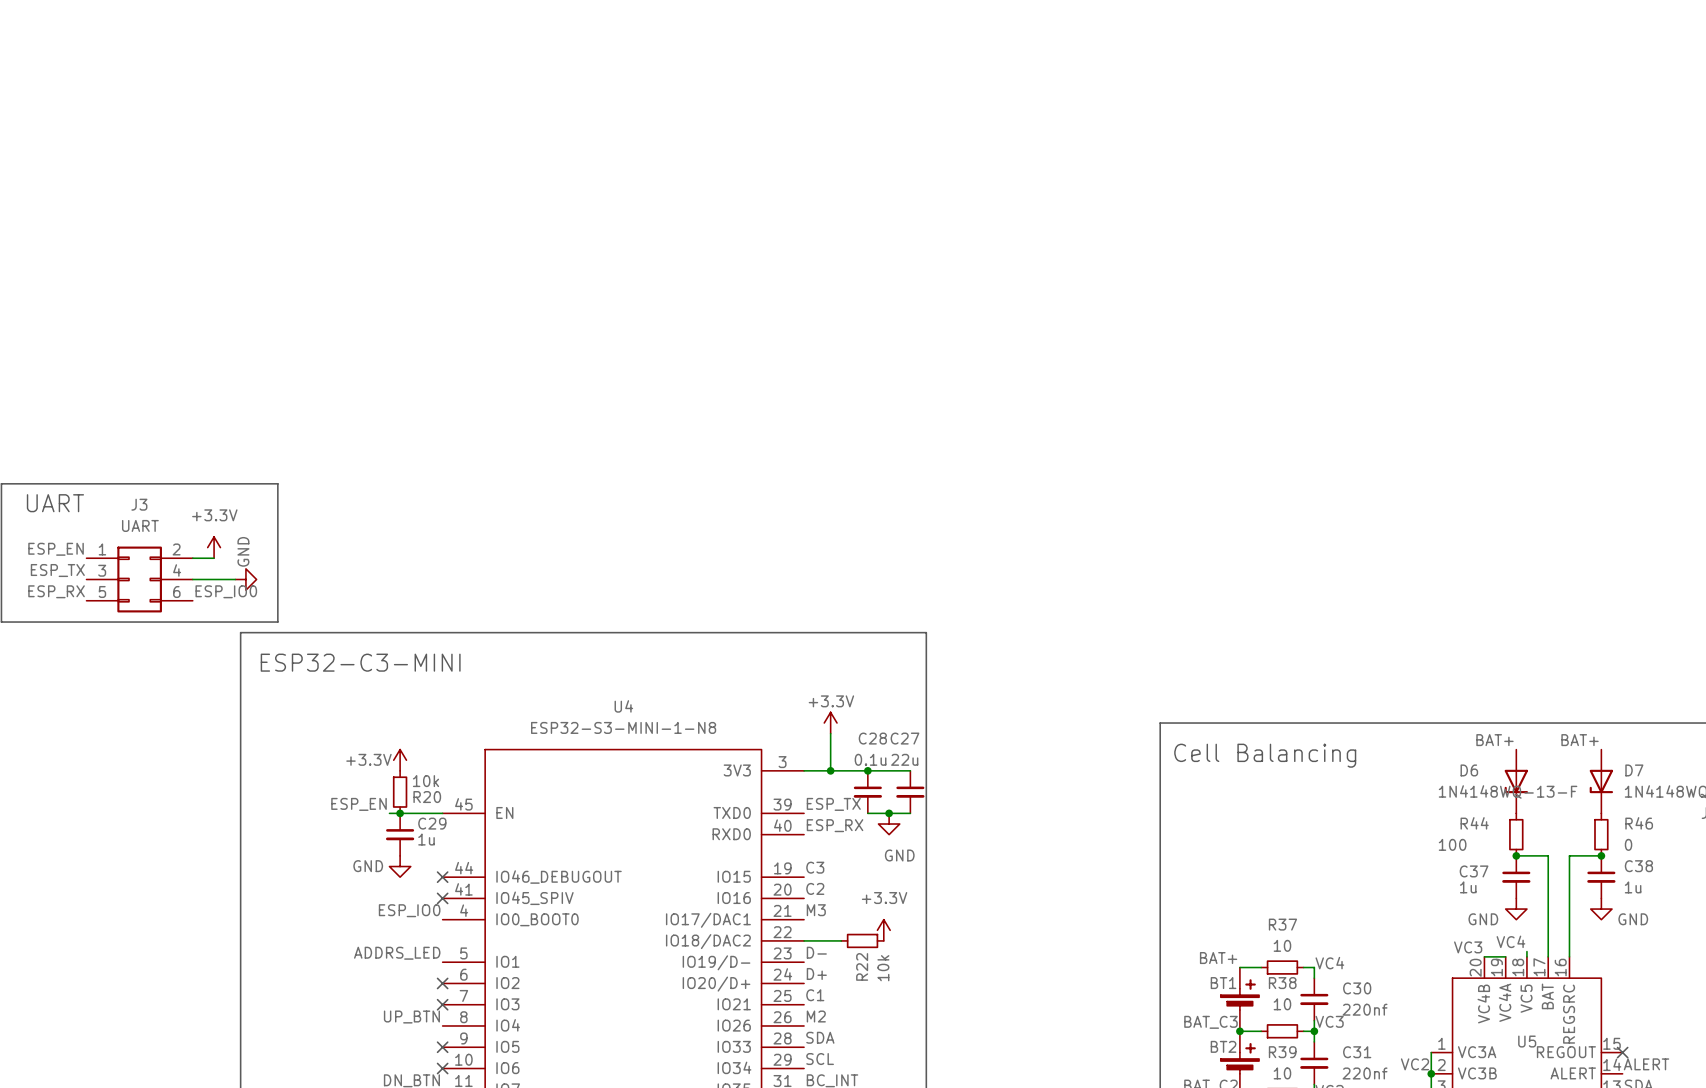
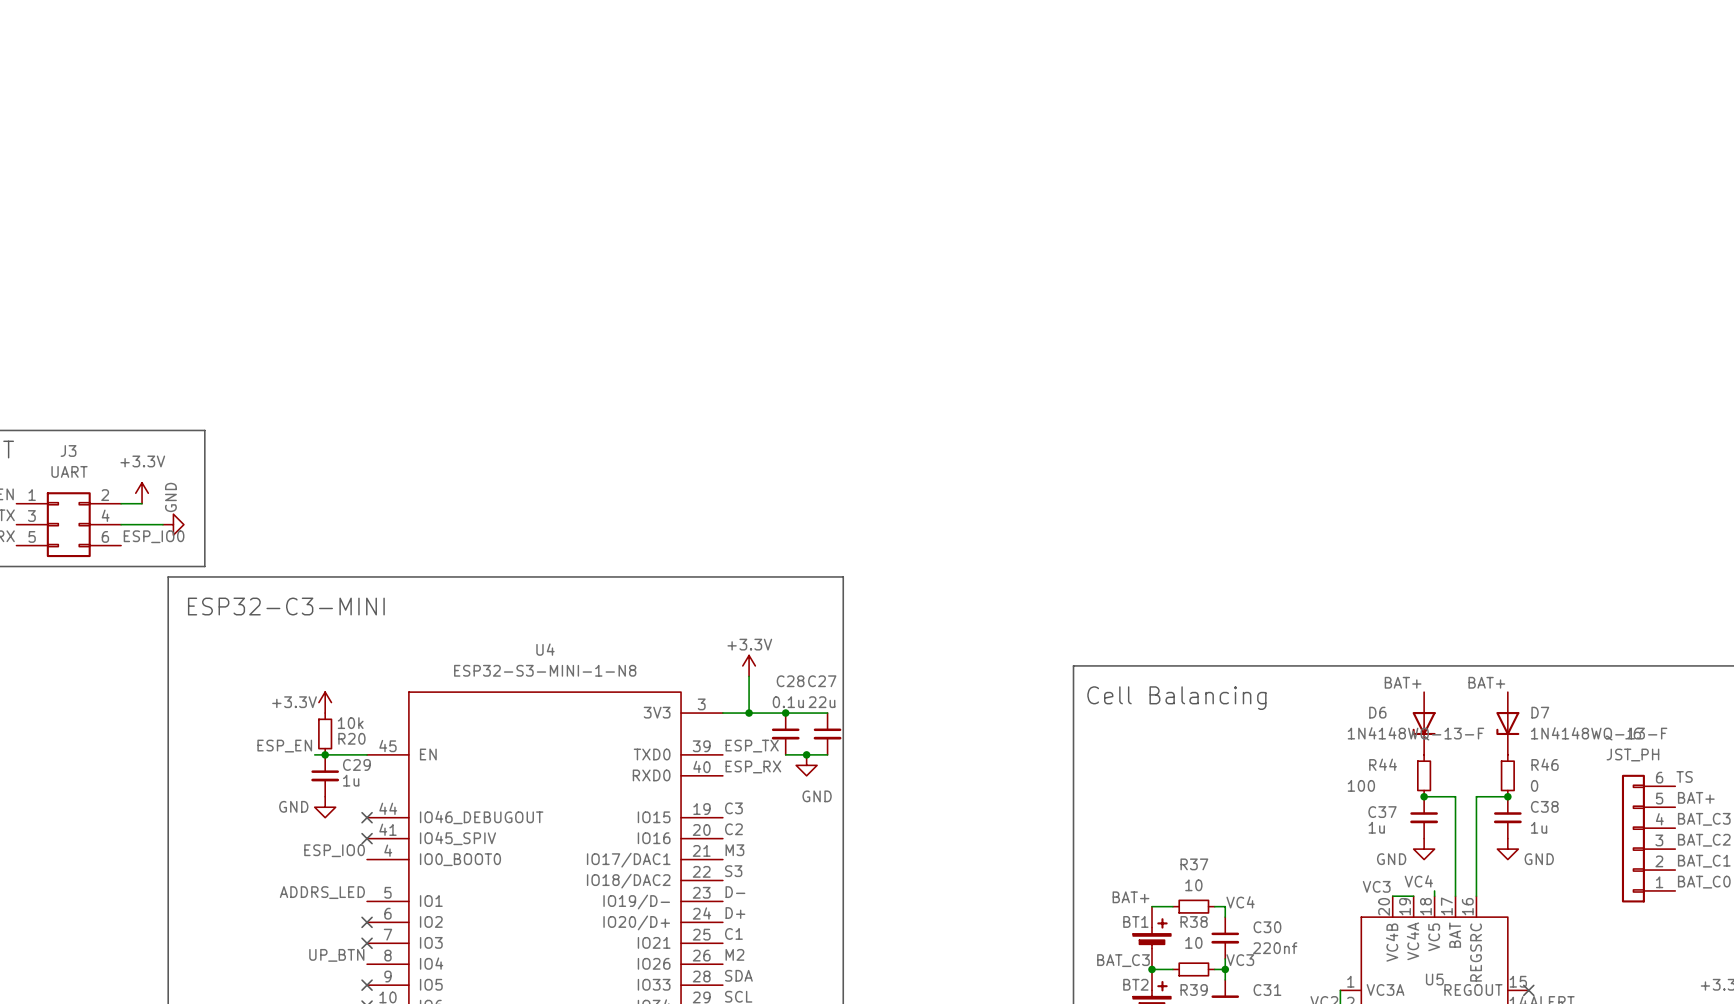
power symbol: +3.3V (883, 930) -> none
label: none -> S3 (733, 871)
wire: (804, 940) (841, 940) -> none
R22: 10k (862, 940) -> none

